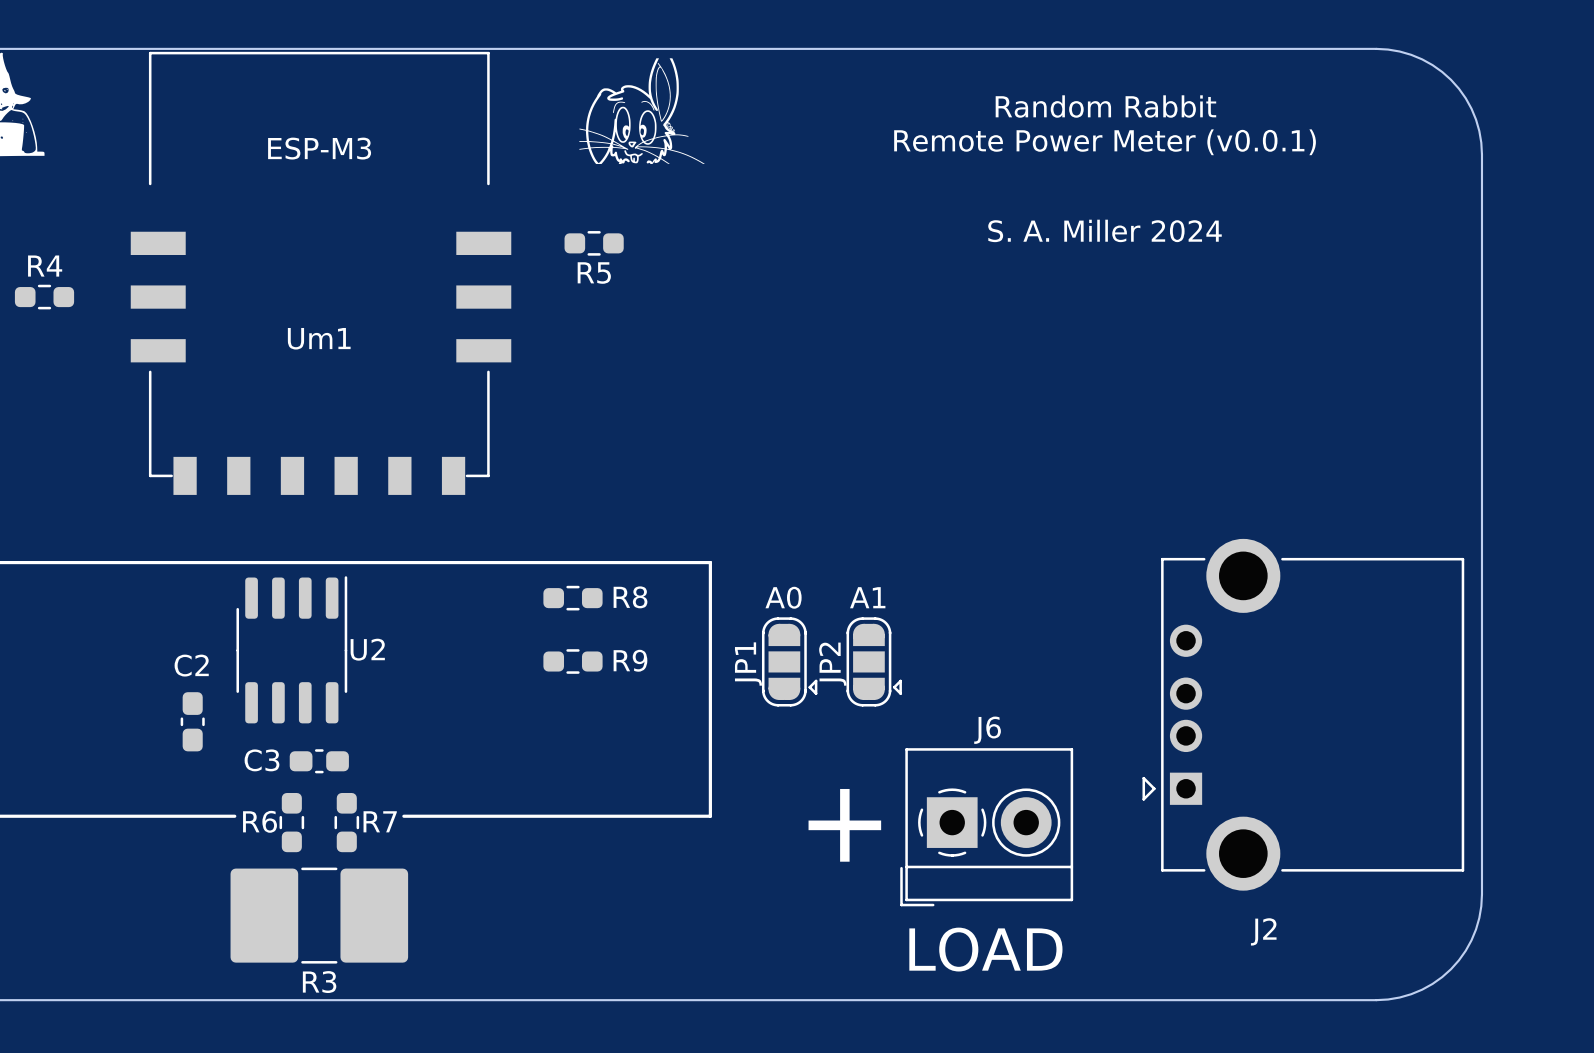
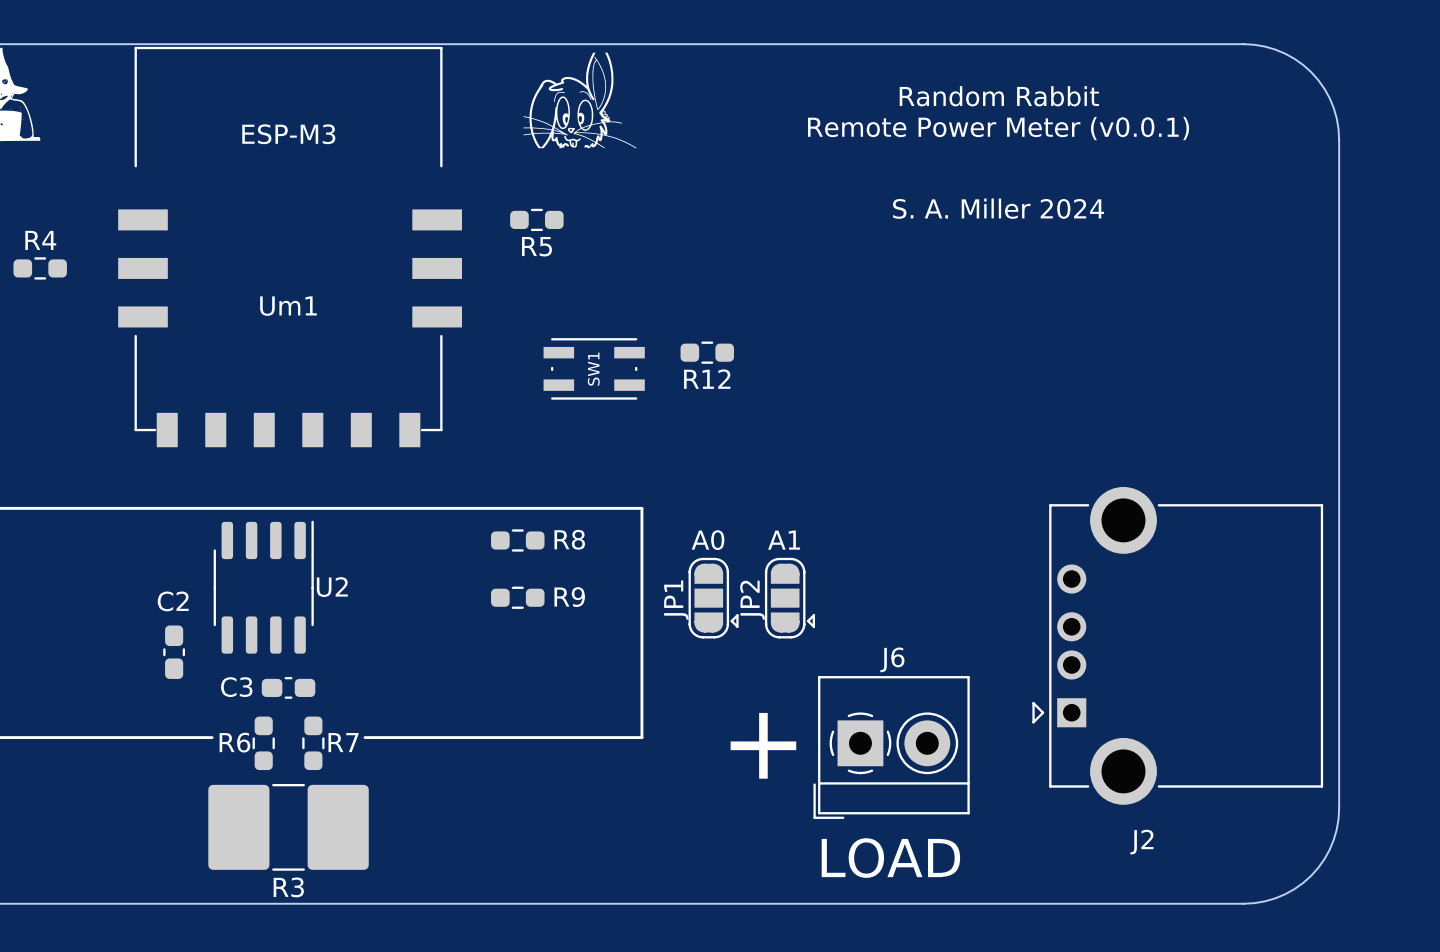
R12: none -> (707, 352)
SW1: none -> (594, 368)

